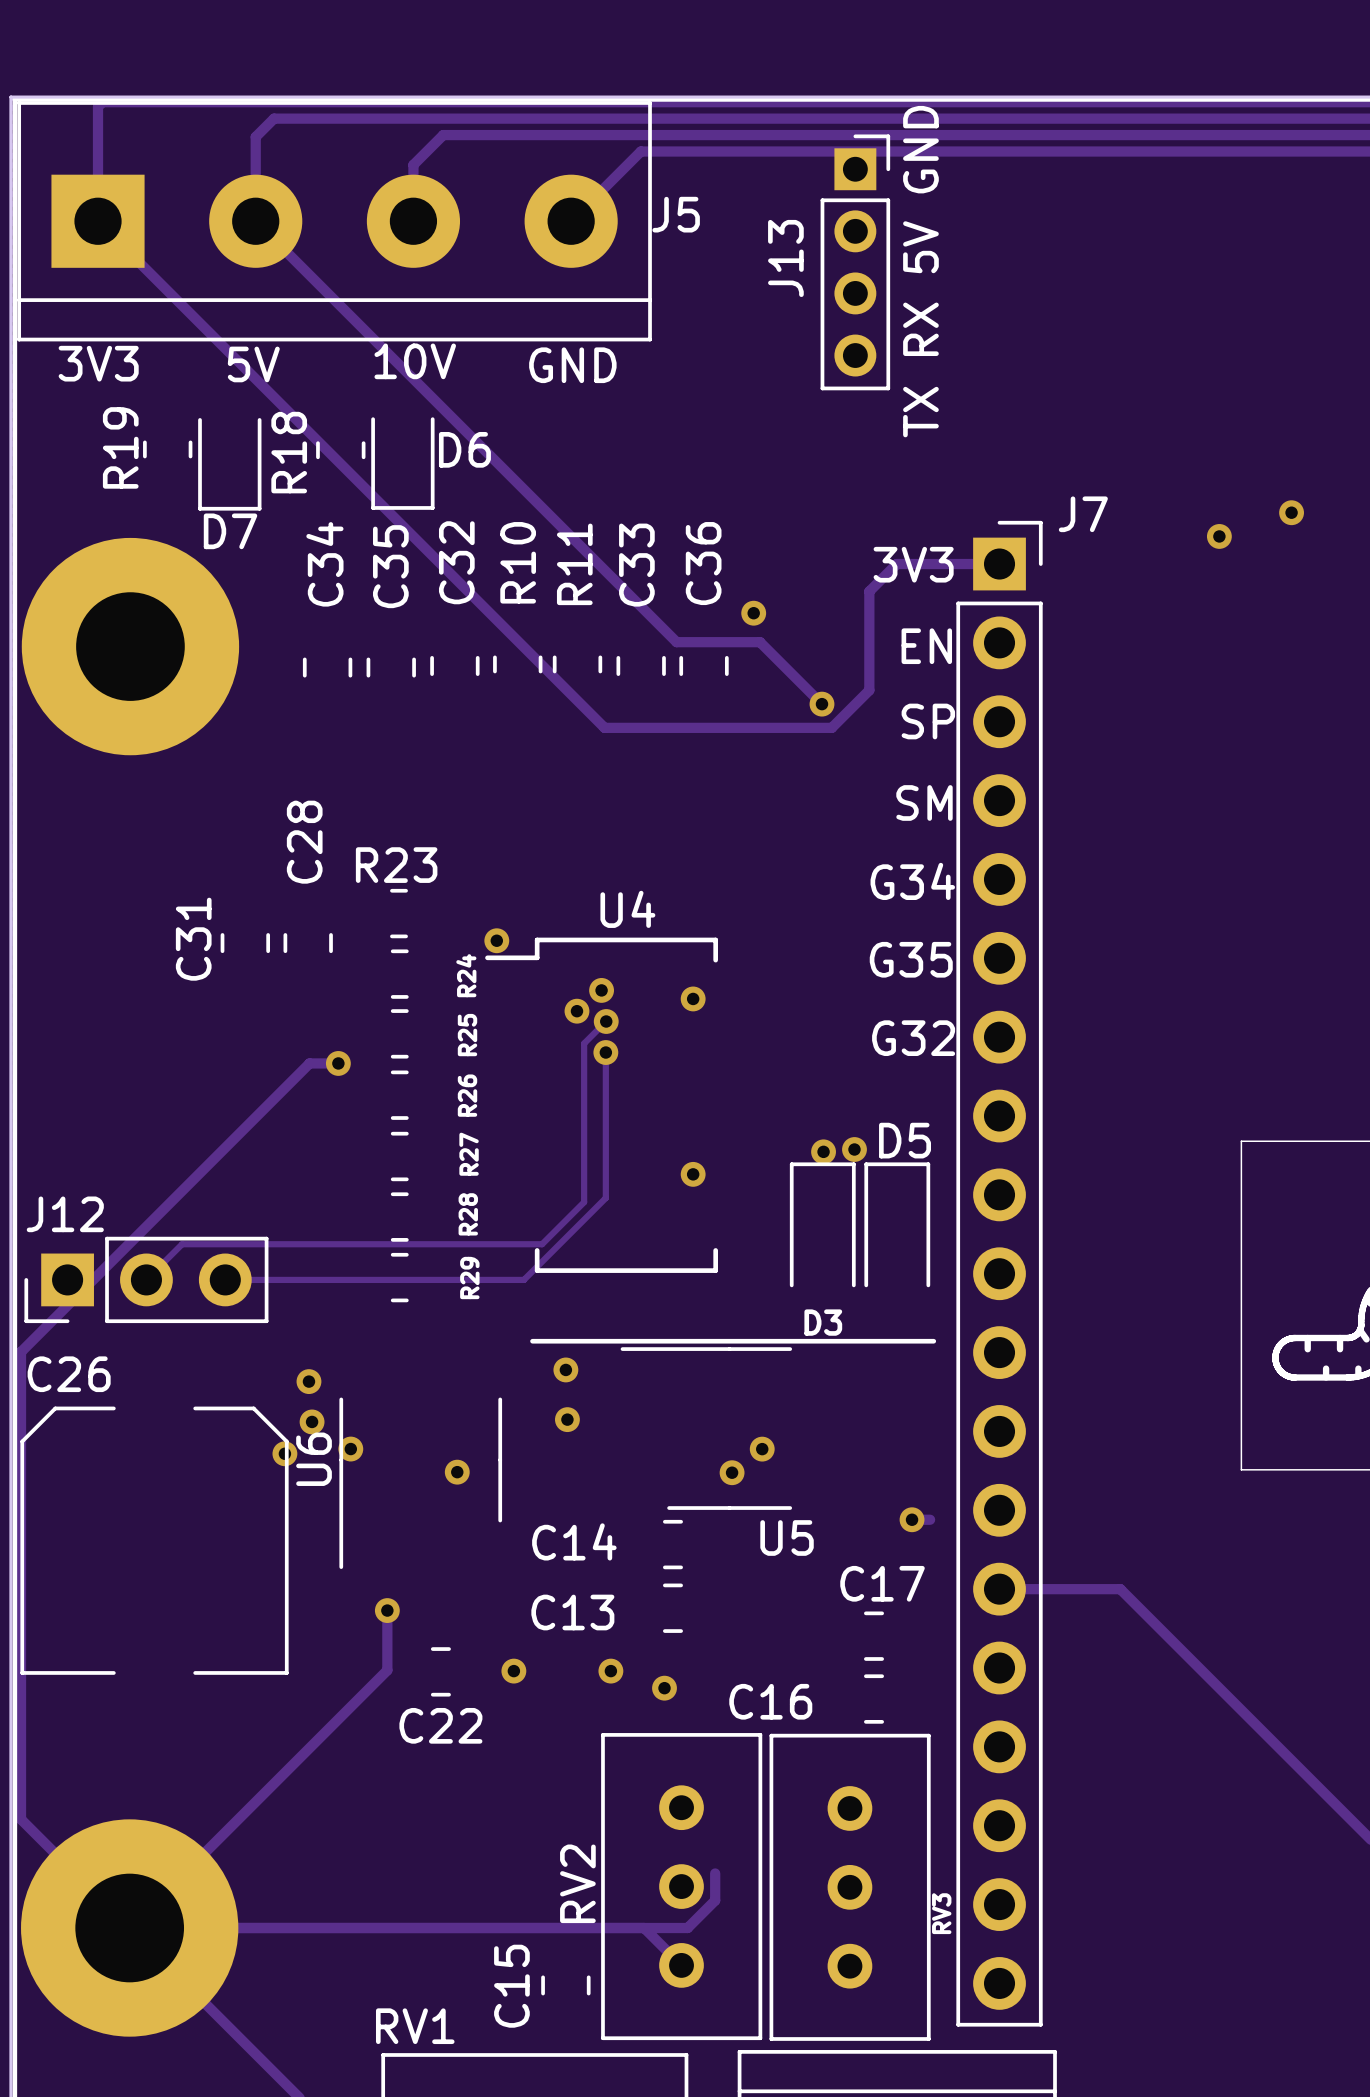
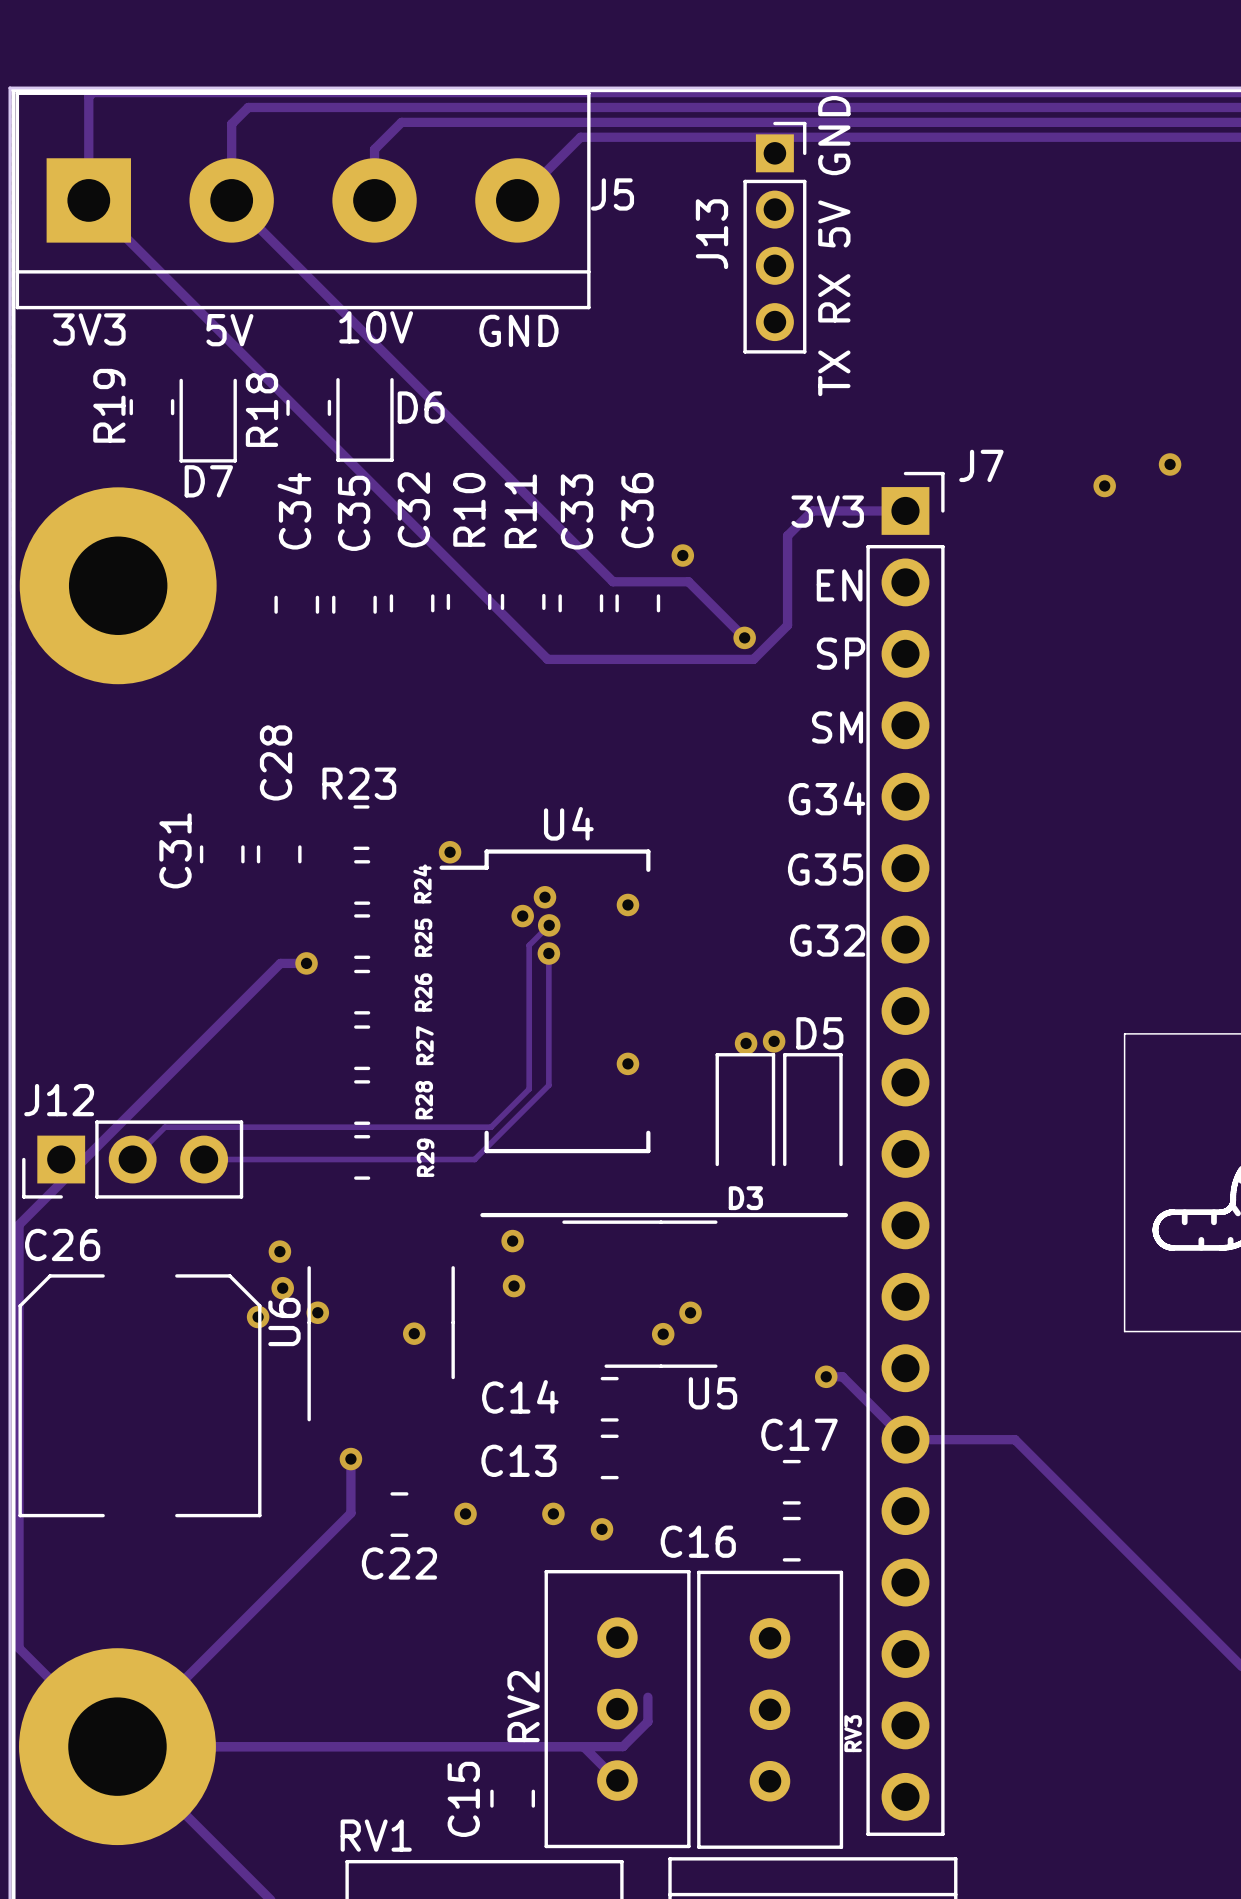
track: none -> (842, 1376) (905, 1439)

